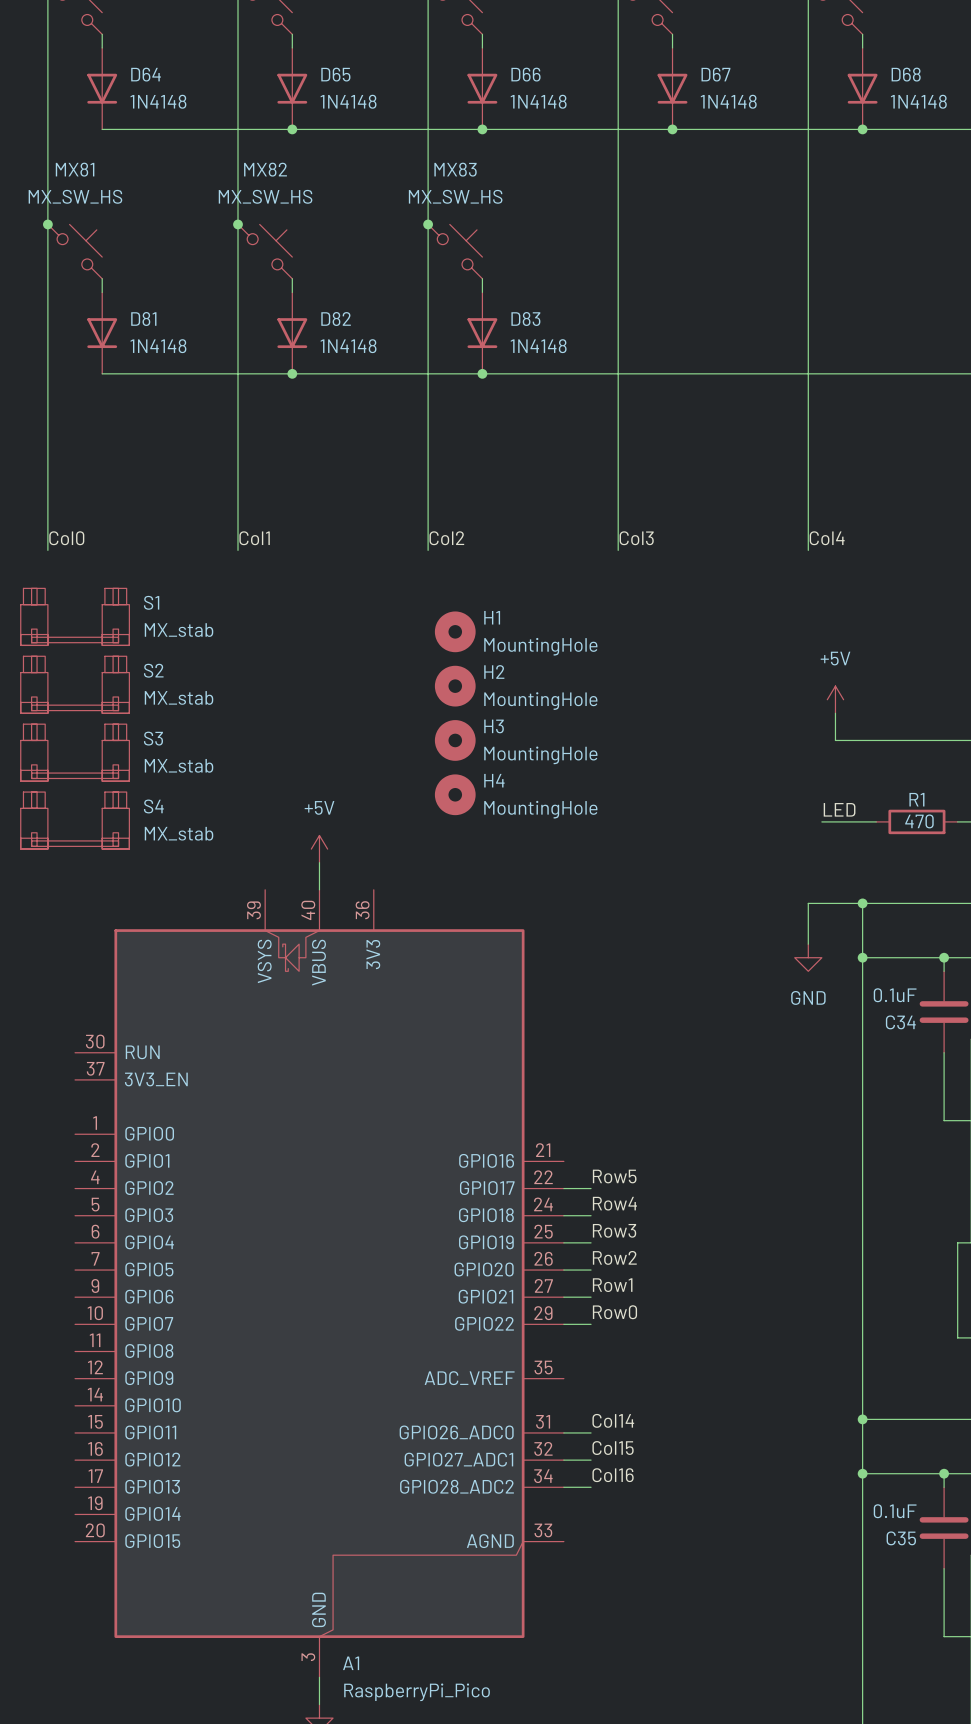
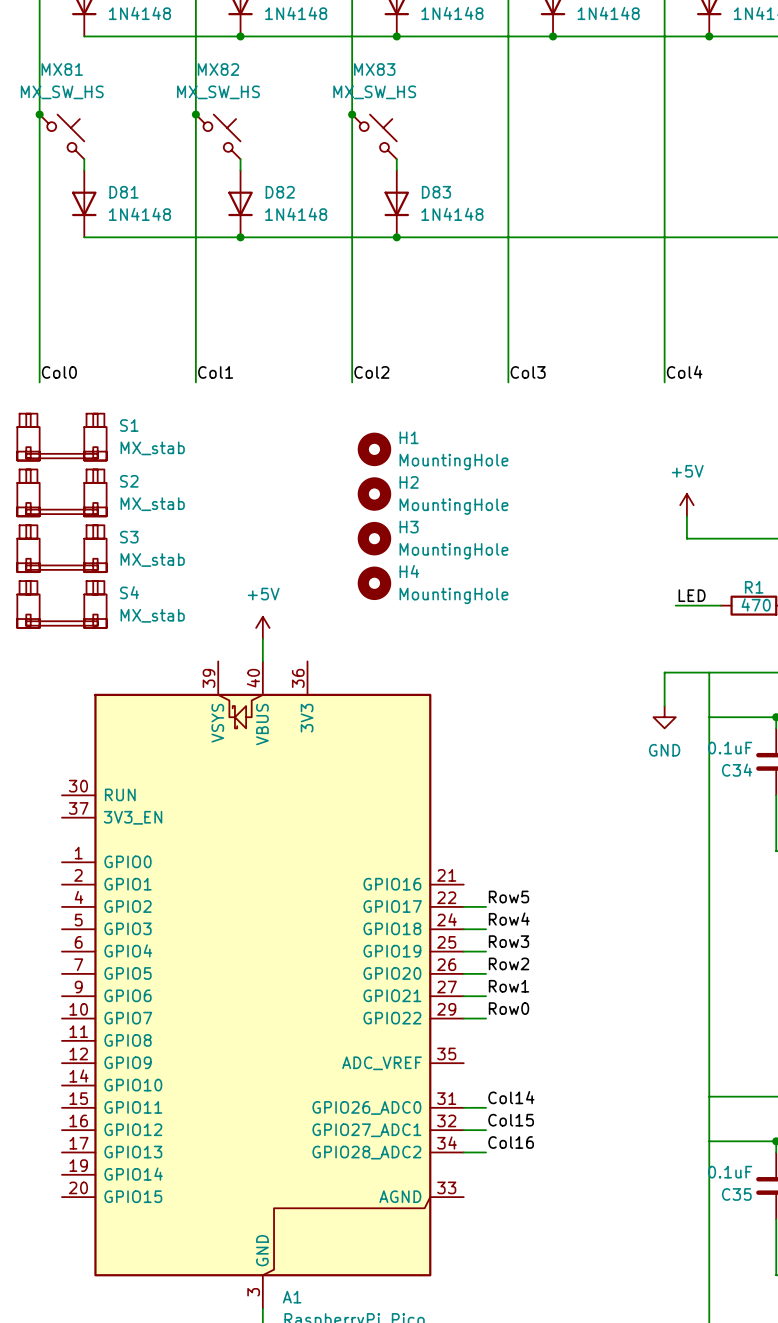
junction: (862, 903) -> none
junction: (862, 957) -> none
junction: (862, 1419) -> none
junction: (862, 1473) -> none

